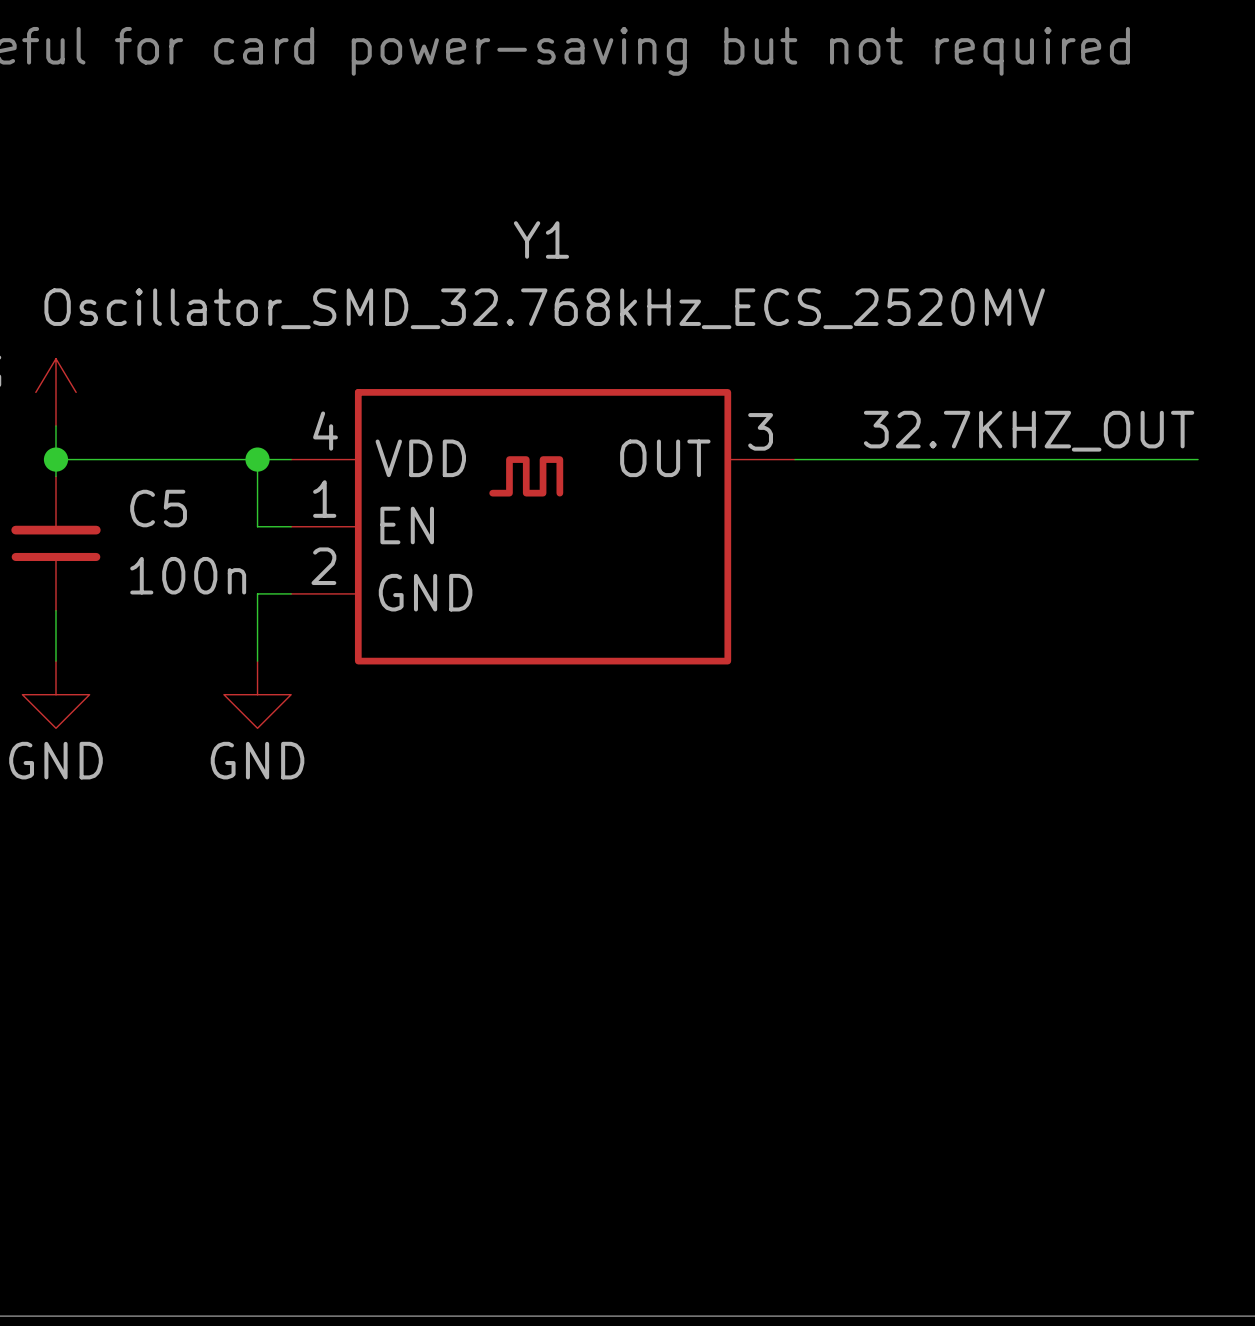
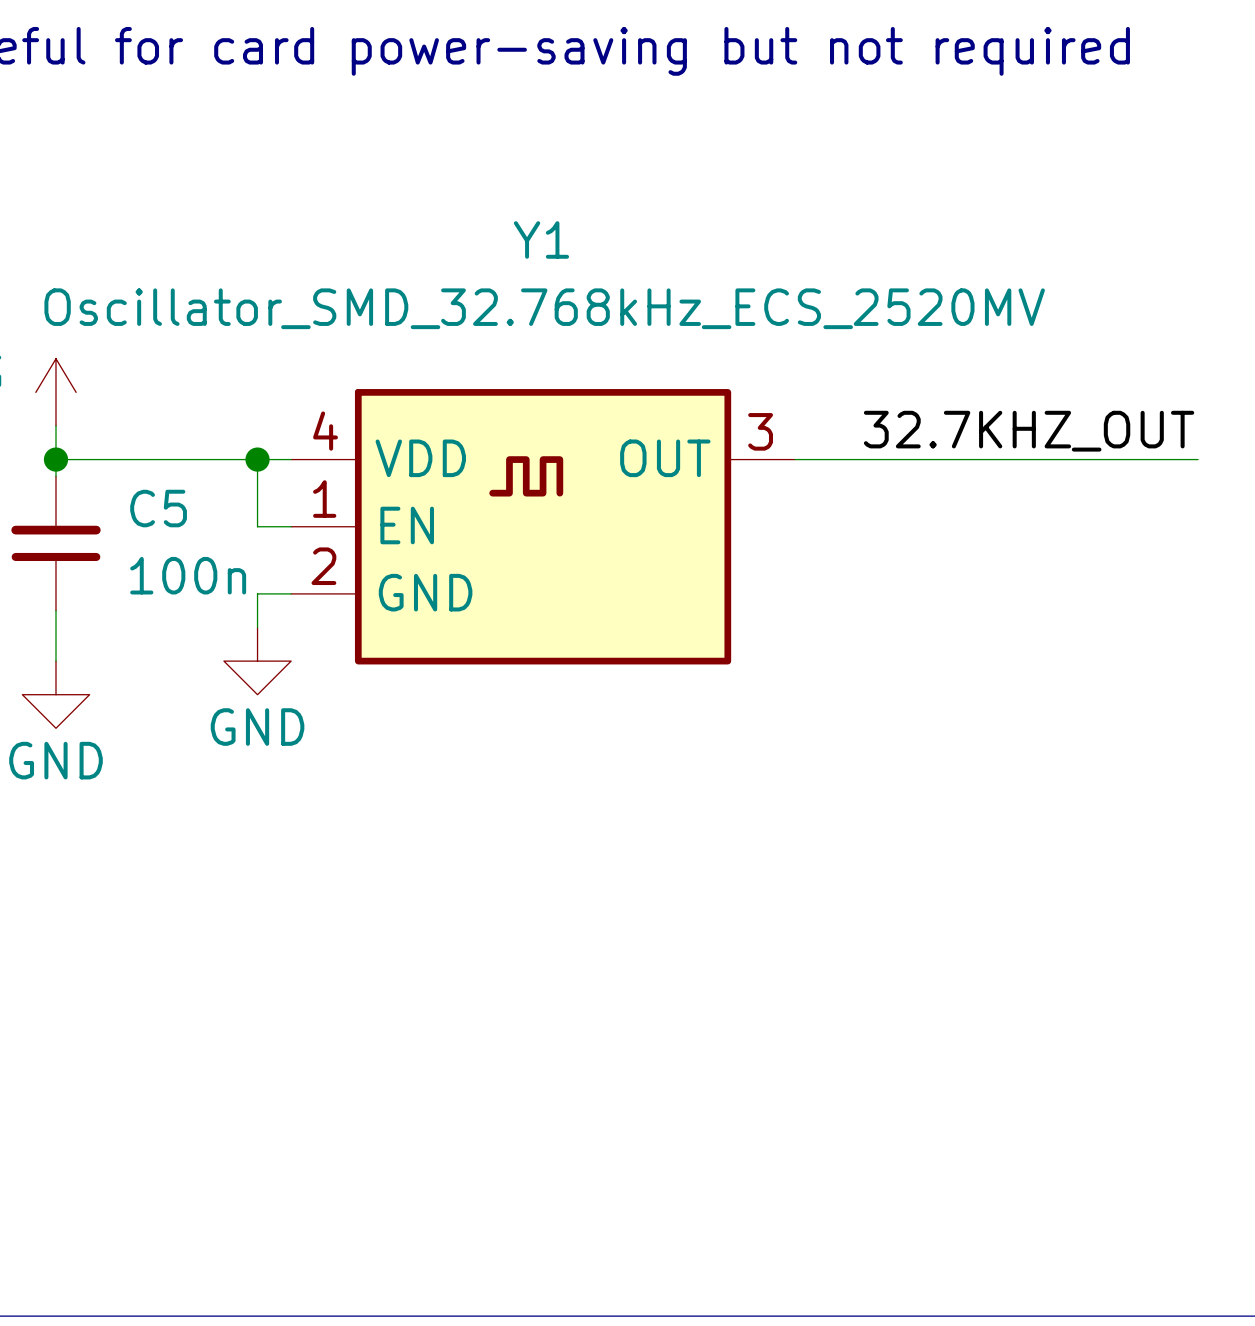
power symbol position: GND (257, 694) -> GND (257, 661)

